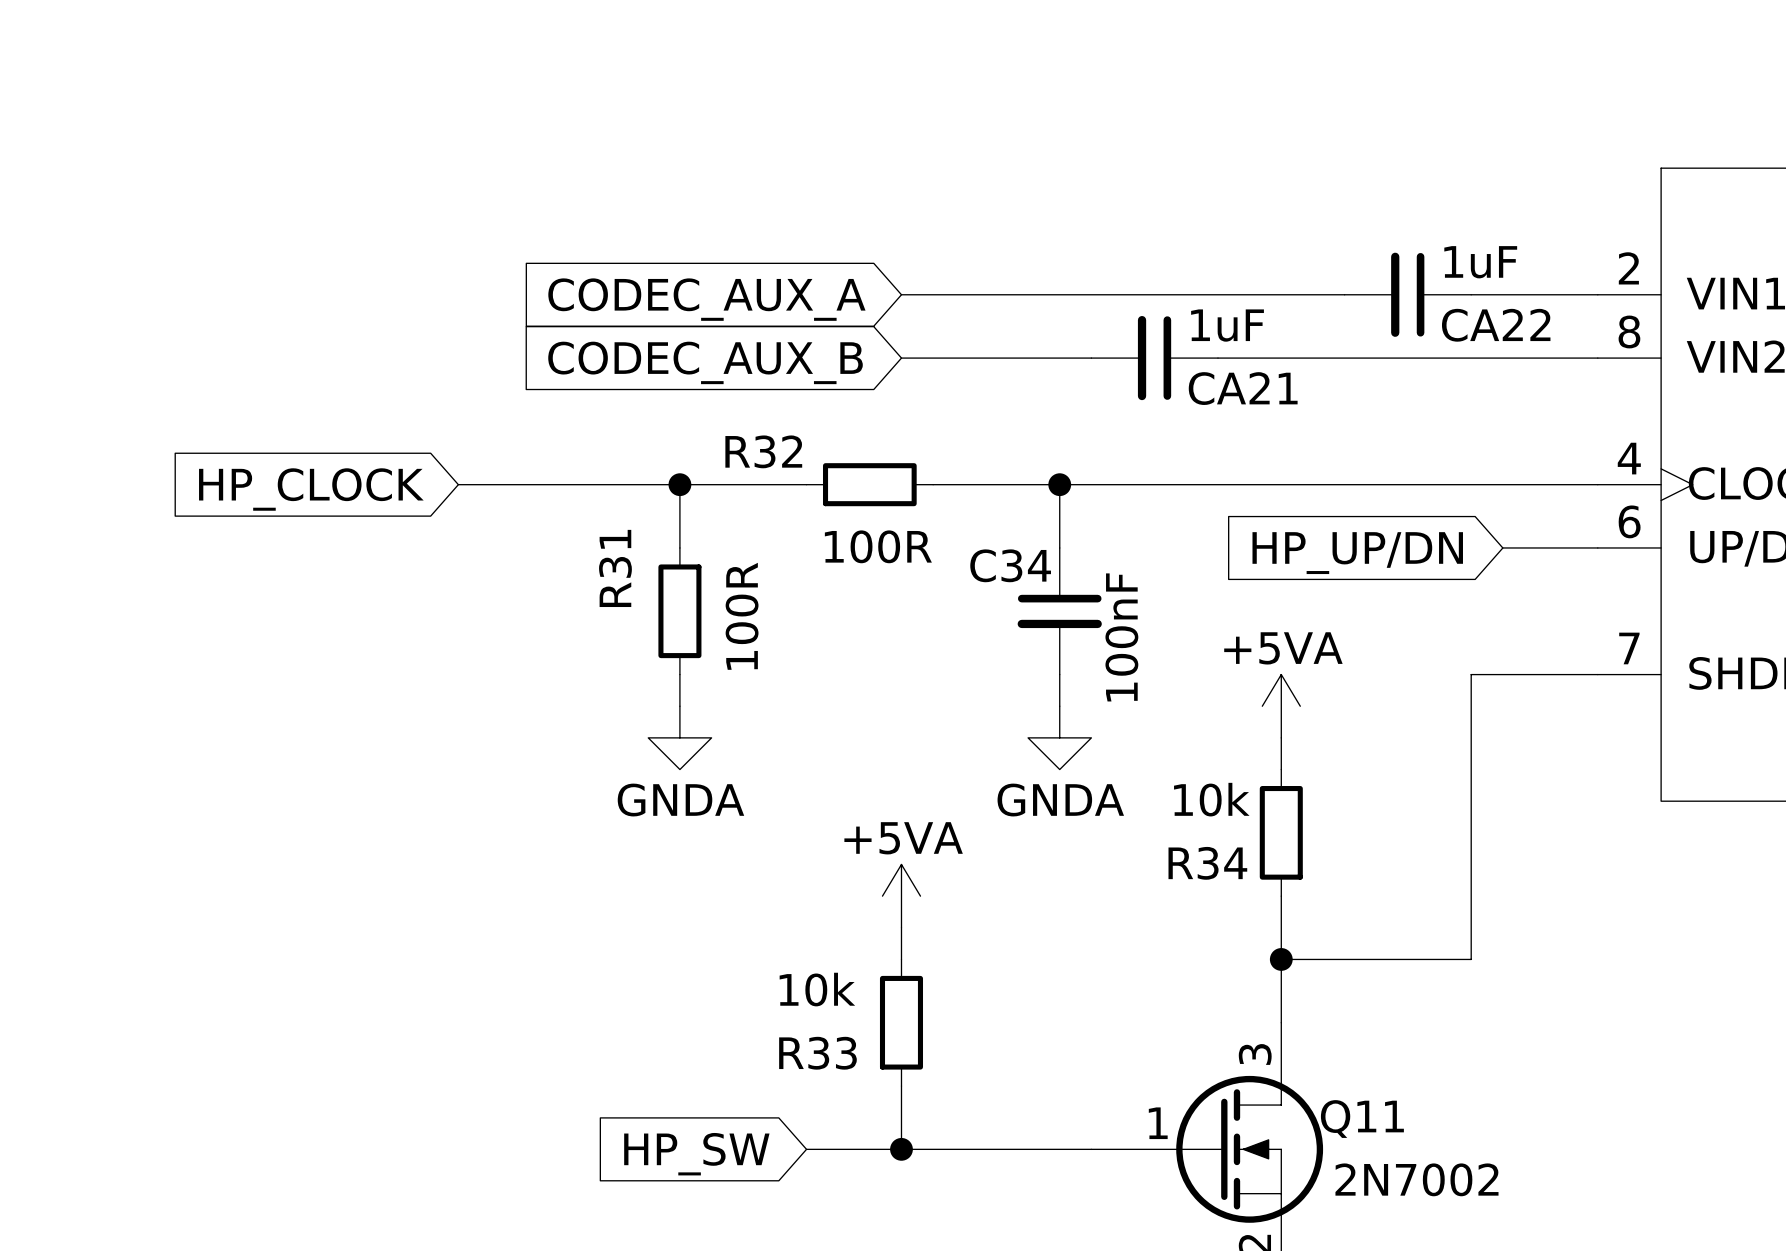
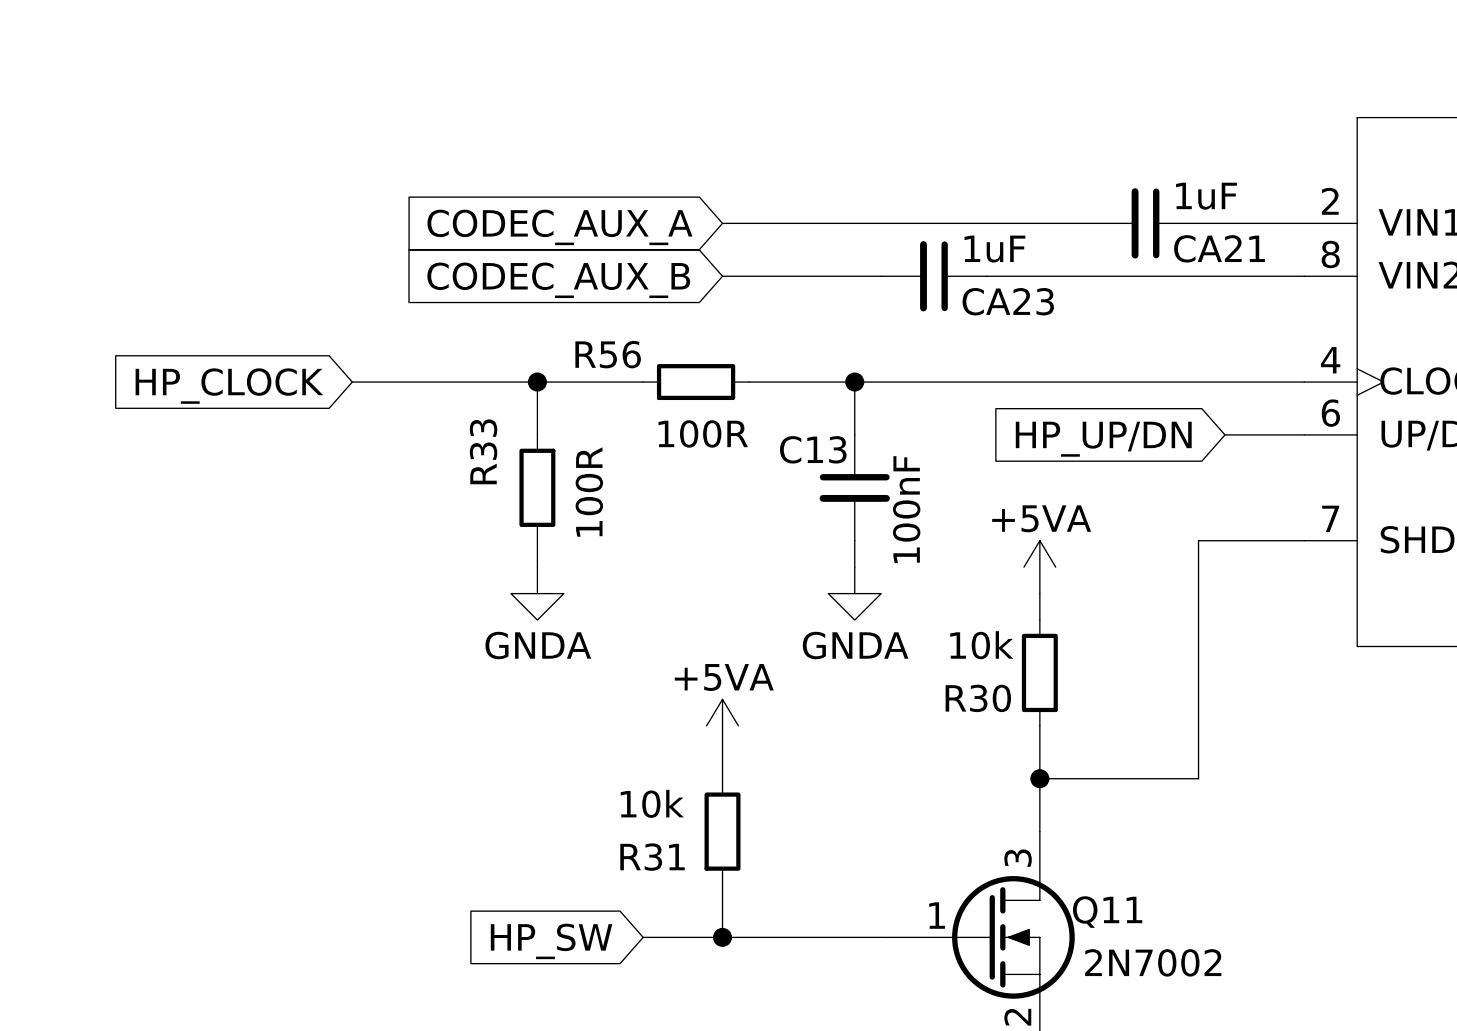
CA22 name: CA22 (1496, 325) -> CA21 (1219, 248)
CA21 name: CA21 (1243, 388) -> CA23 (1008, 301)
R32 name: R32 (763, 451) -> R56 (608, 354)
C34 name: C34 (1010, 565) -> C13 (813, 449)
R31 name: R31 (615, 568) -> R33 (483, 451)
R34 name: R34 (1207, 863) -> R30 (978, 698)
R33 name: R33 (817, 1053) -> R31 (652, 857)

